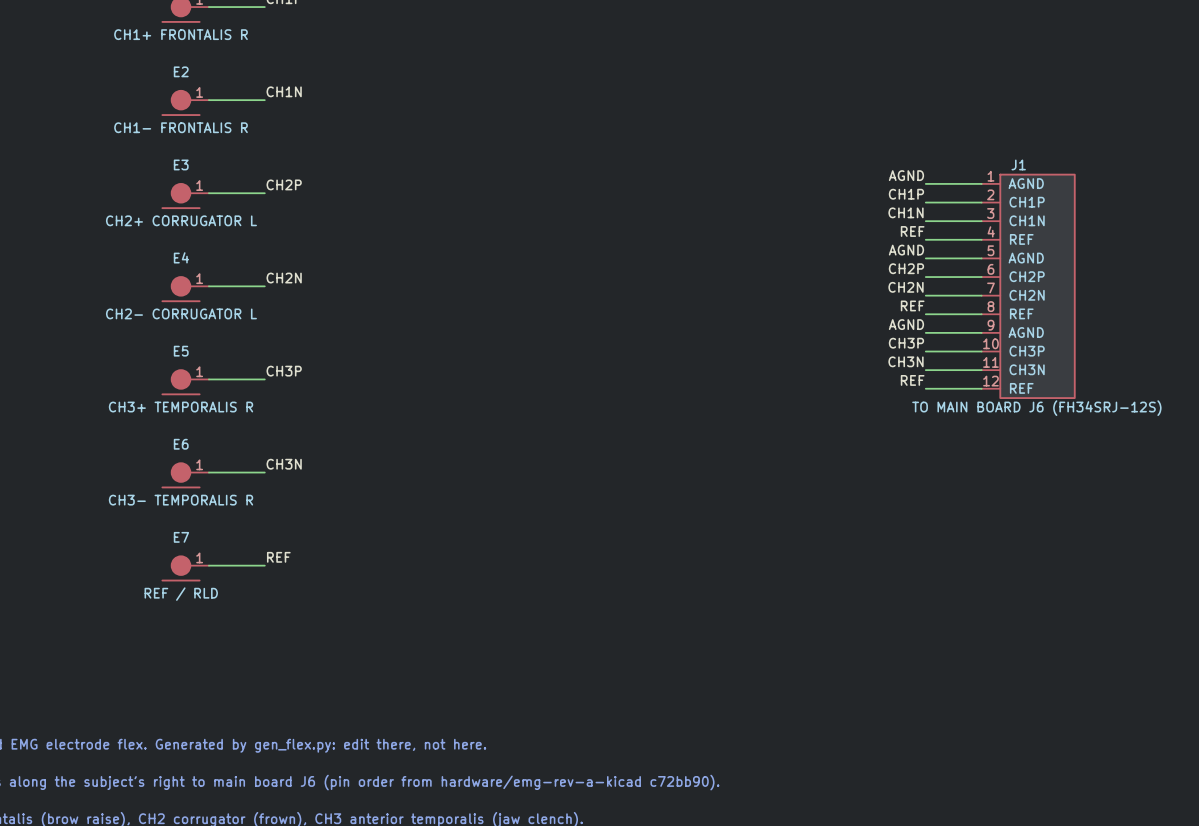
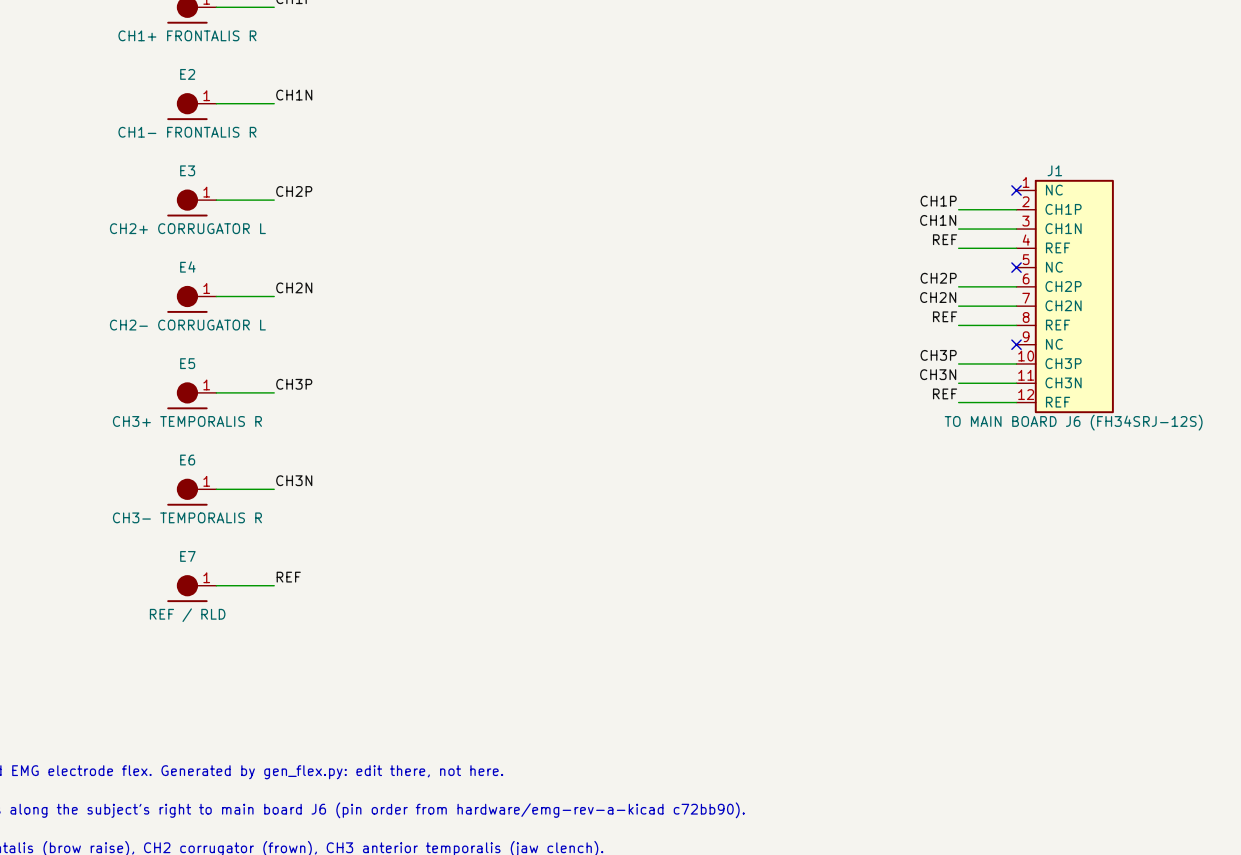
label: AGND (906, 175) -> none
wire: (925, 183) (981, 183) -> none
no-connect mark: none -> (1016, 190)
J1 pin name: AGND (1026, 183) -> NC (1054, 190)
label: AGND (906, 250) -> none
wire: (925, 258) (981, 258) -> none
no-connect mark: none -> (1016, 267)
J1 pin name: AGND (1026, 258) -> NC (1054, 267)
label: AGND (906, 324) -> none
wire: (925, 332) (981, 332) -> none
no-connect mark: none -> (1016, 344)
J1 pin name: AGND (1026, 332) -> NC (1054, 344)

